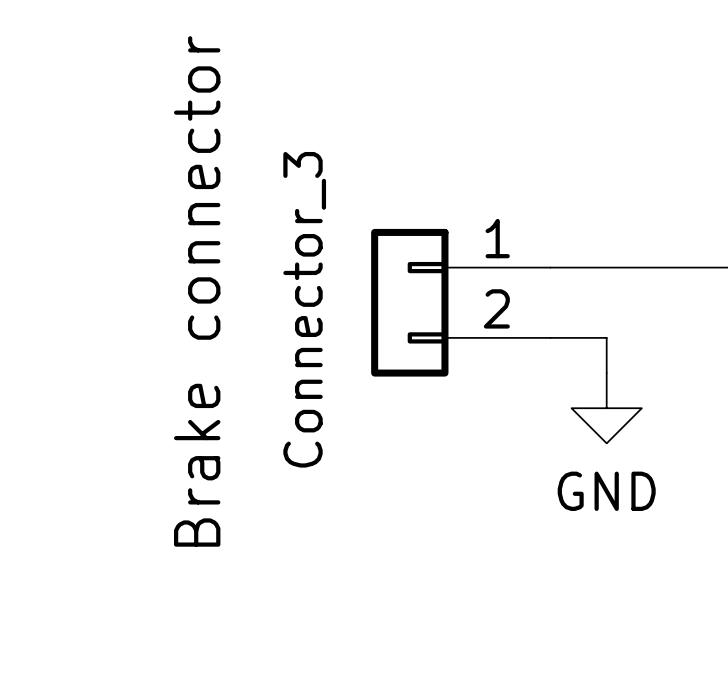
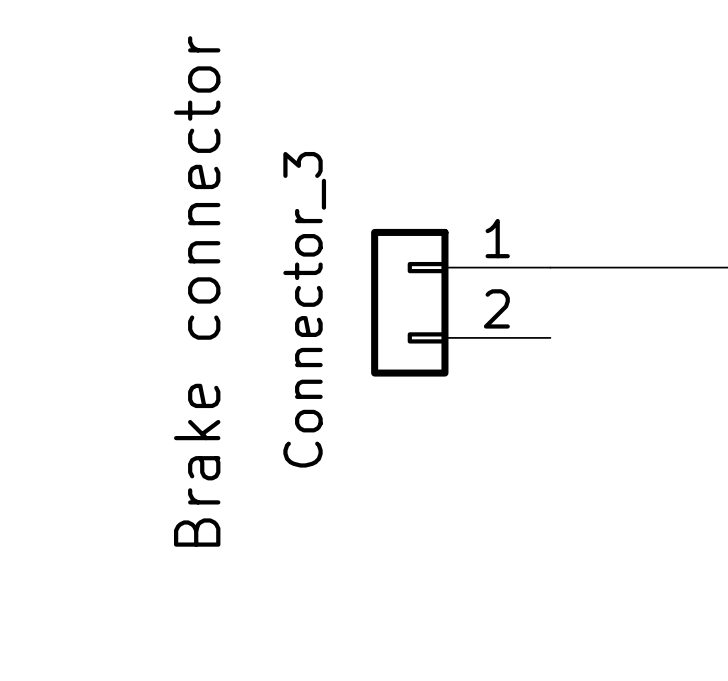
wire: (550, 337) (606, 337) (606, 373) -> none
power symbol: GND (606, 408) -> none

